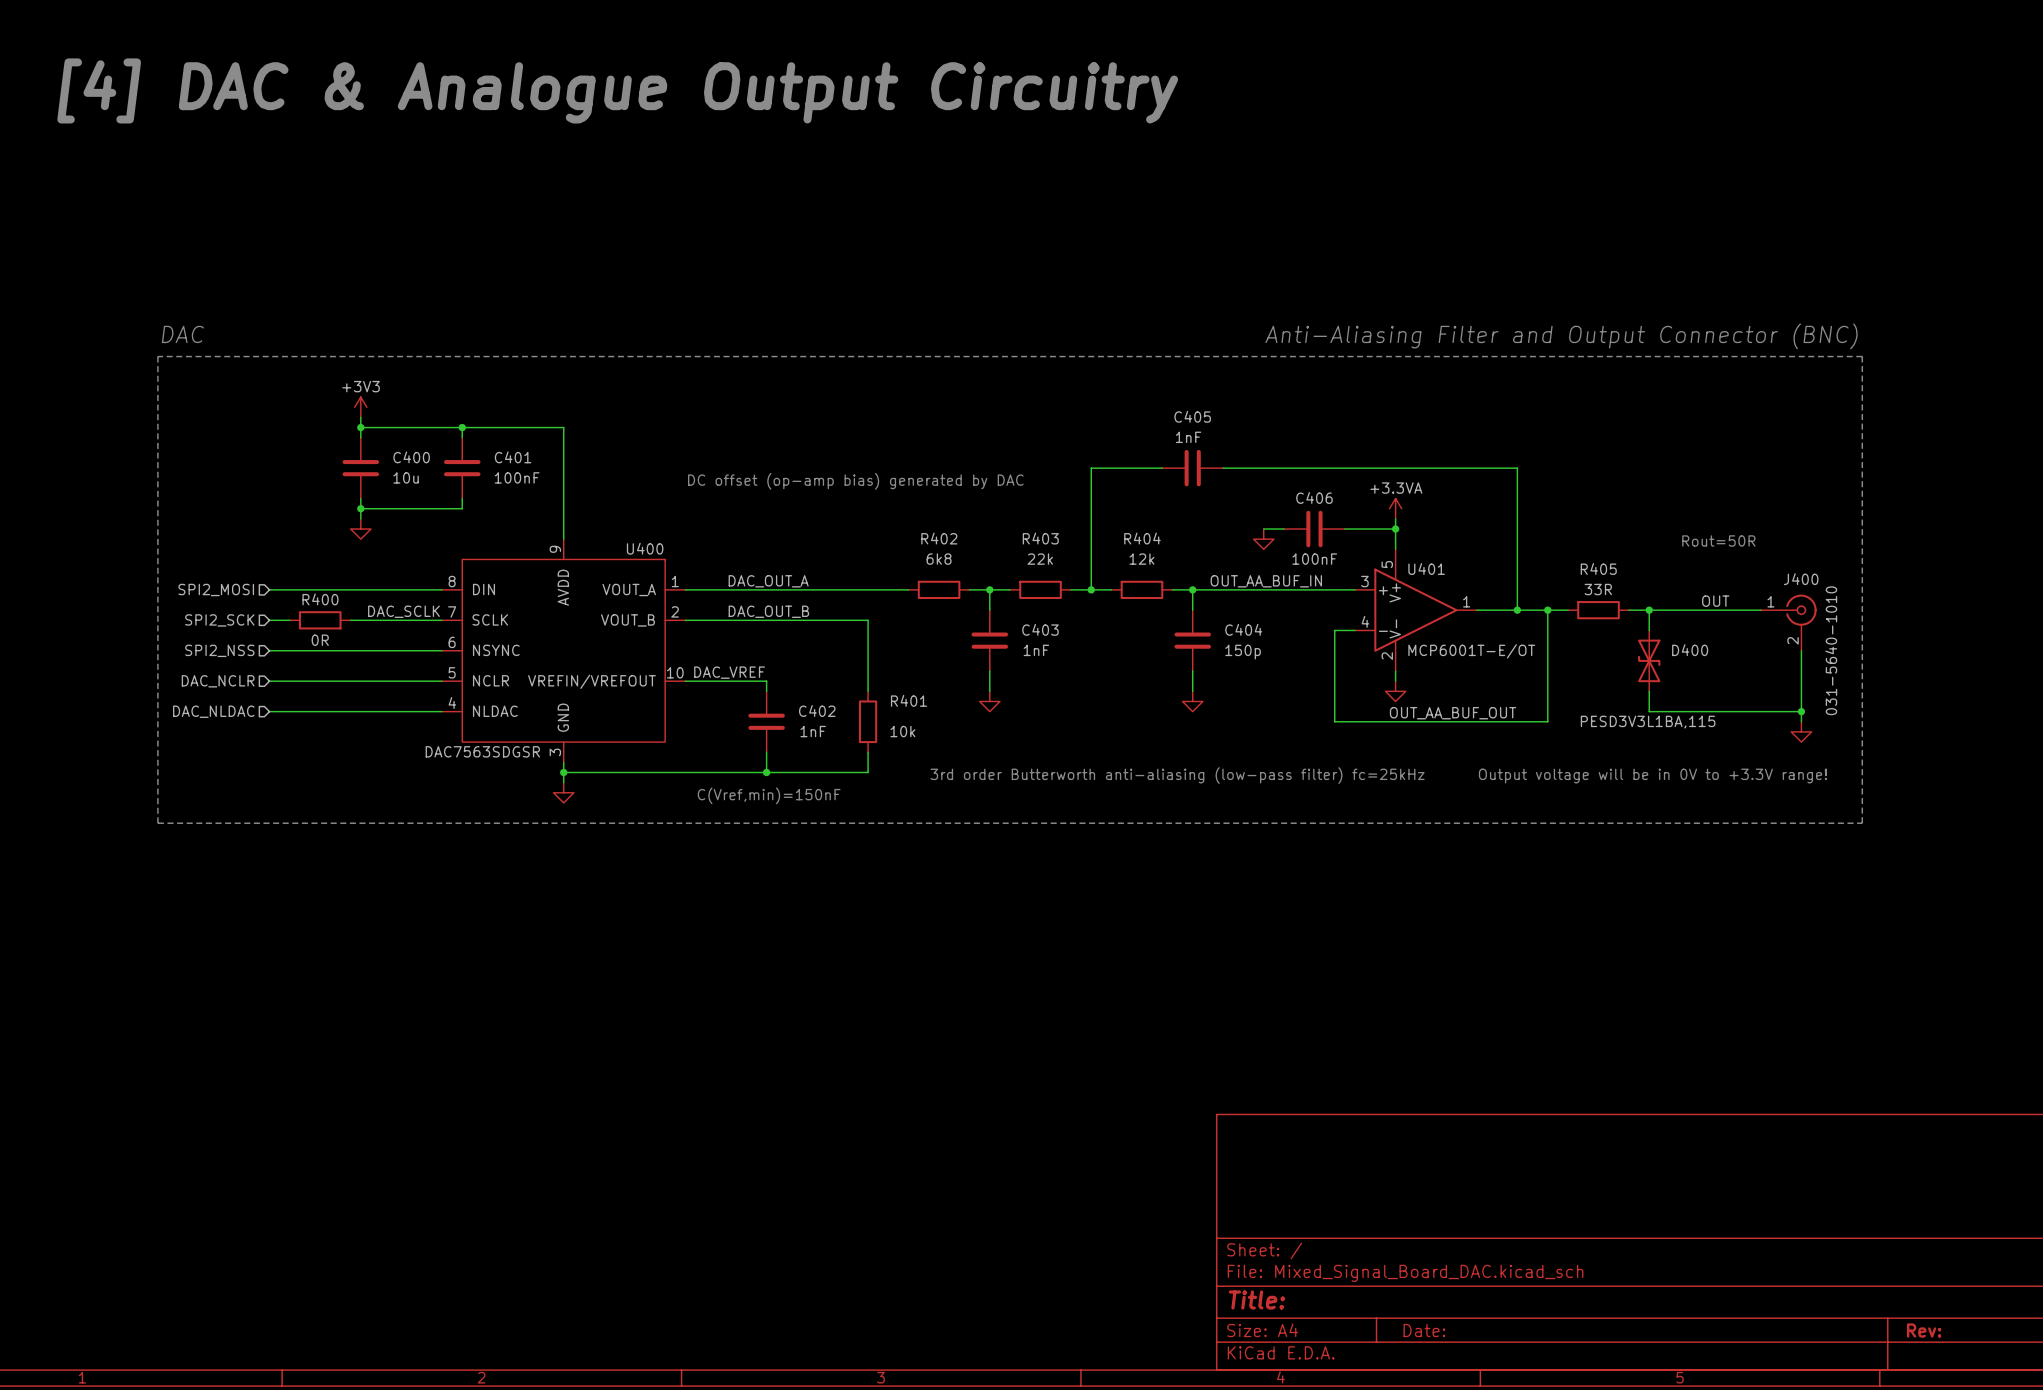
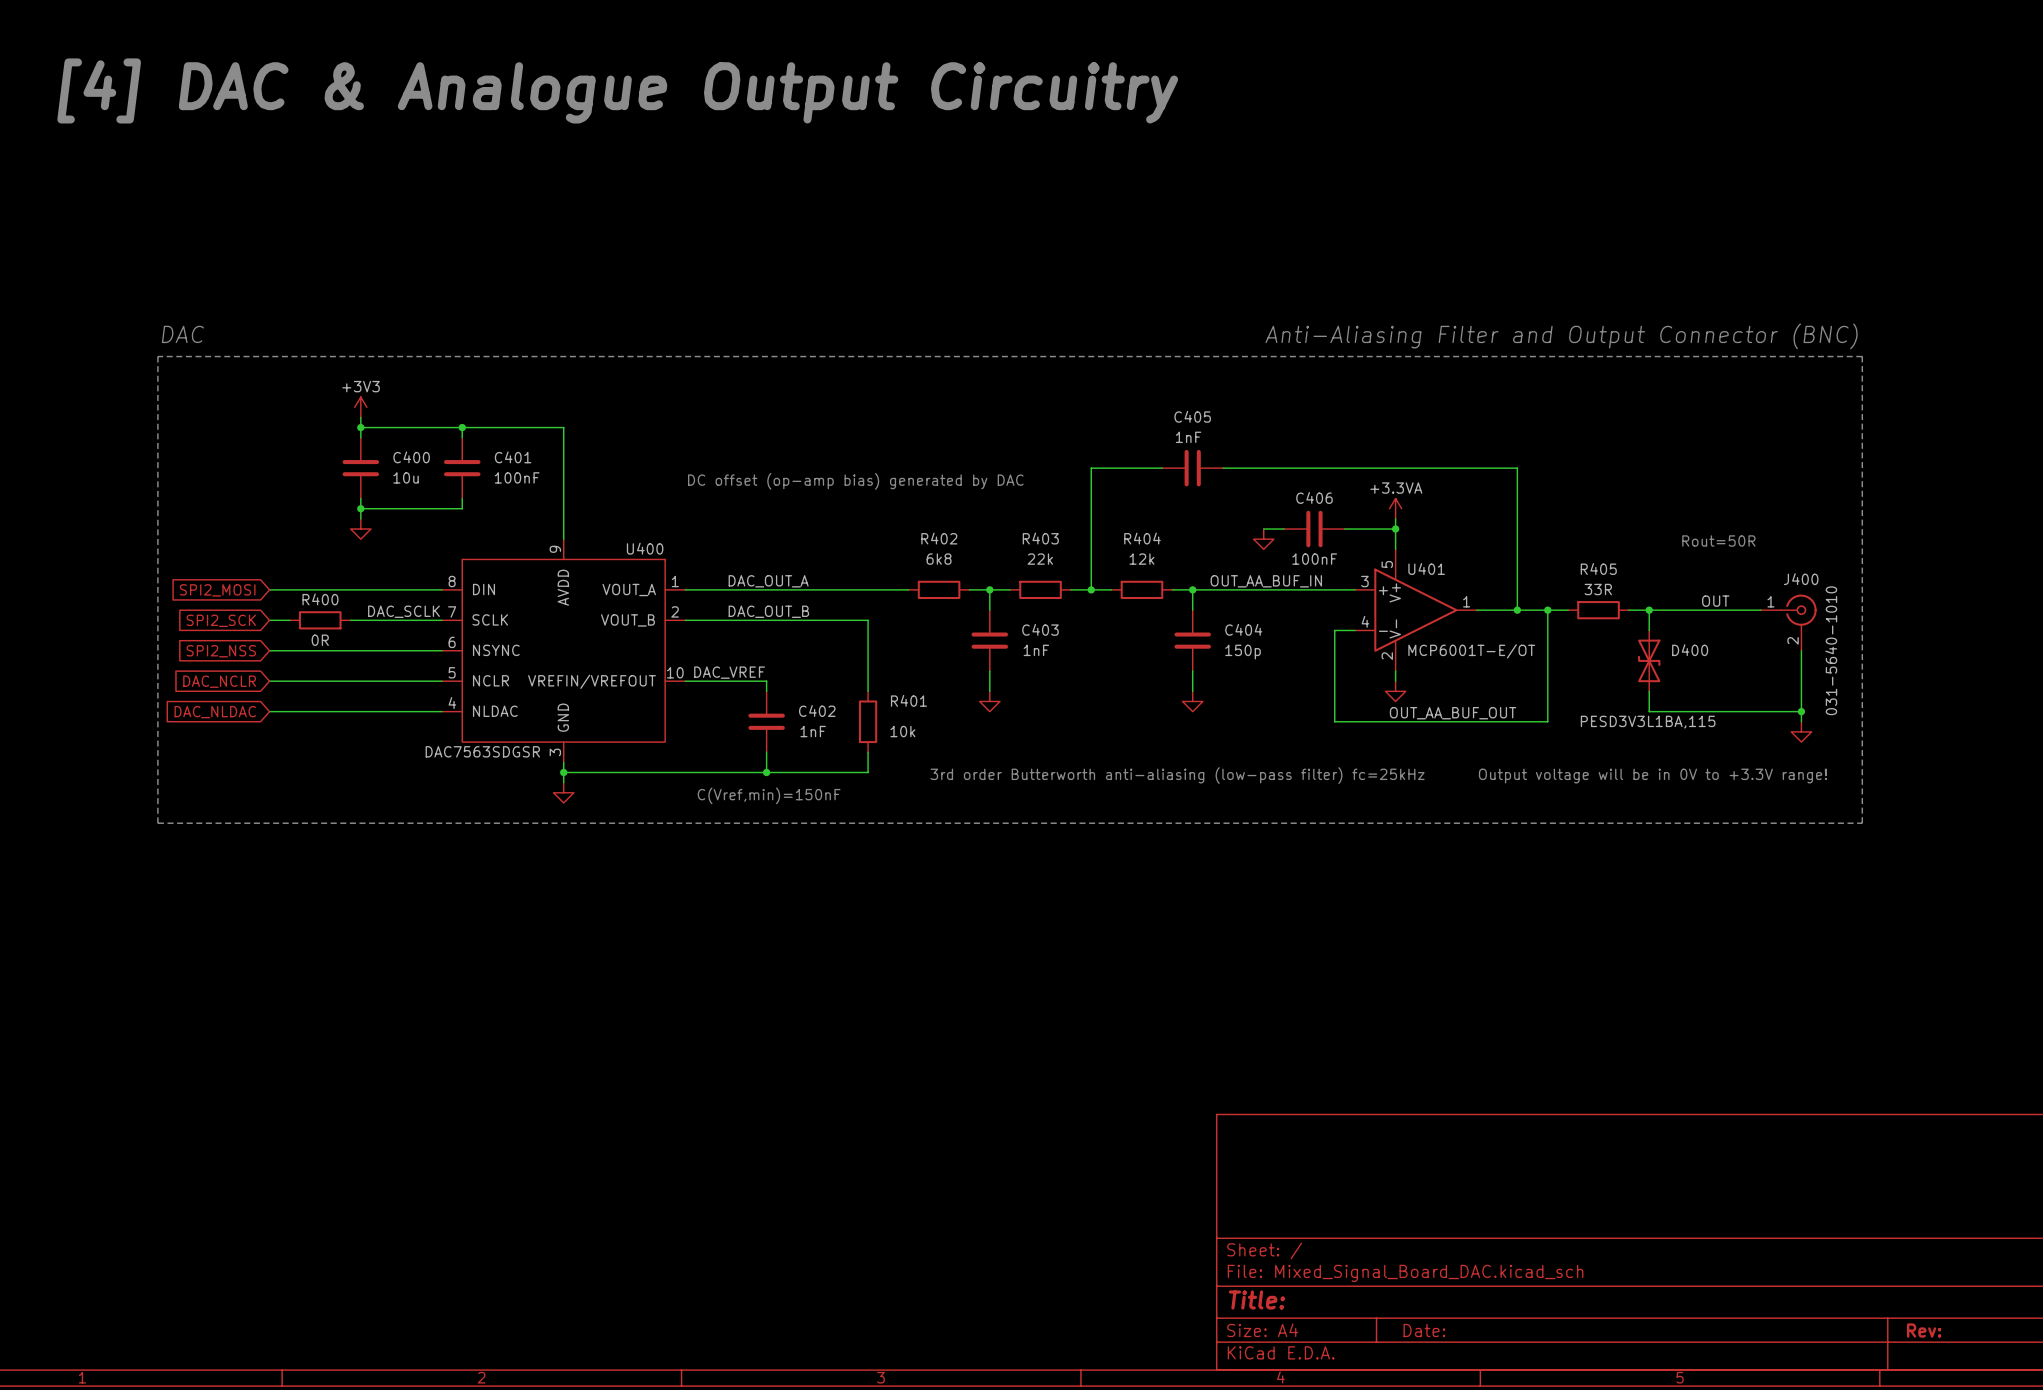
hierarchical label: SPI2_MOSI (216, 589) -> none
global label: none -> SPI2_MOSI (217, 590)
hierarchical label: SPI2_SCK (219, 620) -> none
global label: none -> SPI2_SCK (221, 620)
hierarchical label: SPI2_NSS (219, 650) -> none
global label: none -> SPI2_NSS (221, 651)
hierarchical label: DAC_NCLR (218, 681) -> none
global label: none -> DAC_NCLR (219, 681)
hierarchical label: DAC_NLDAC (213, 711) -> none
global label: none -> DAC_NLDAC (215, 712)

